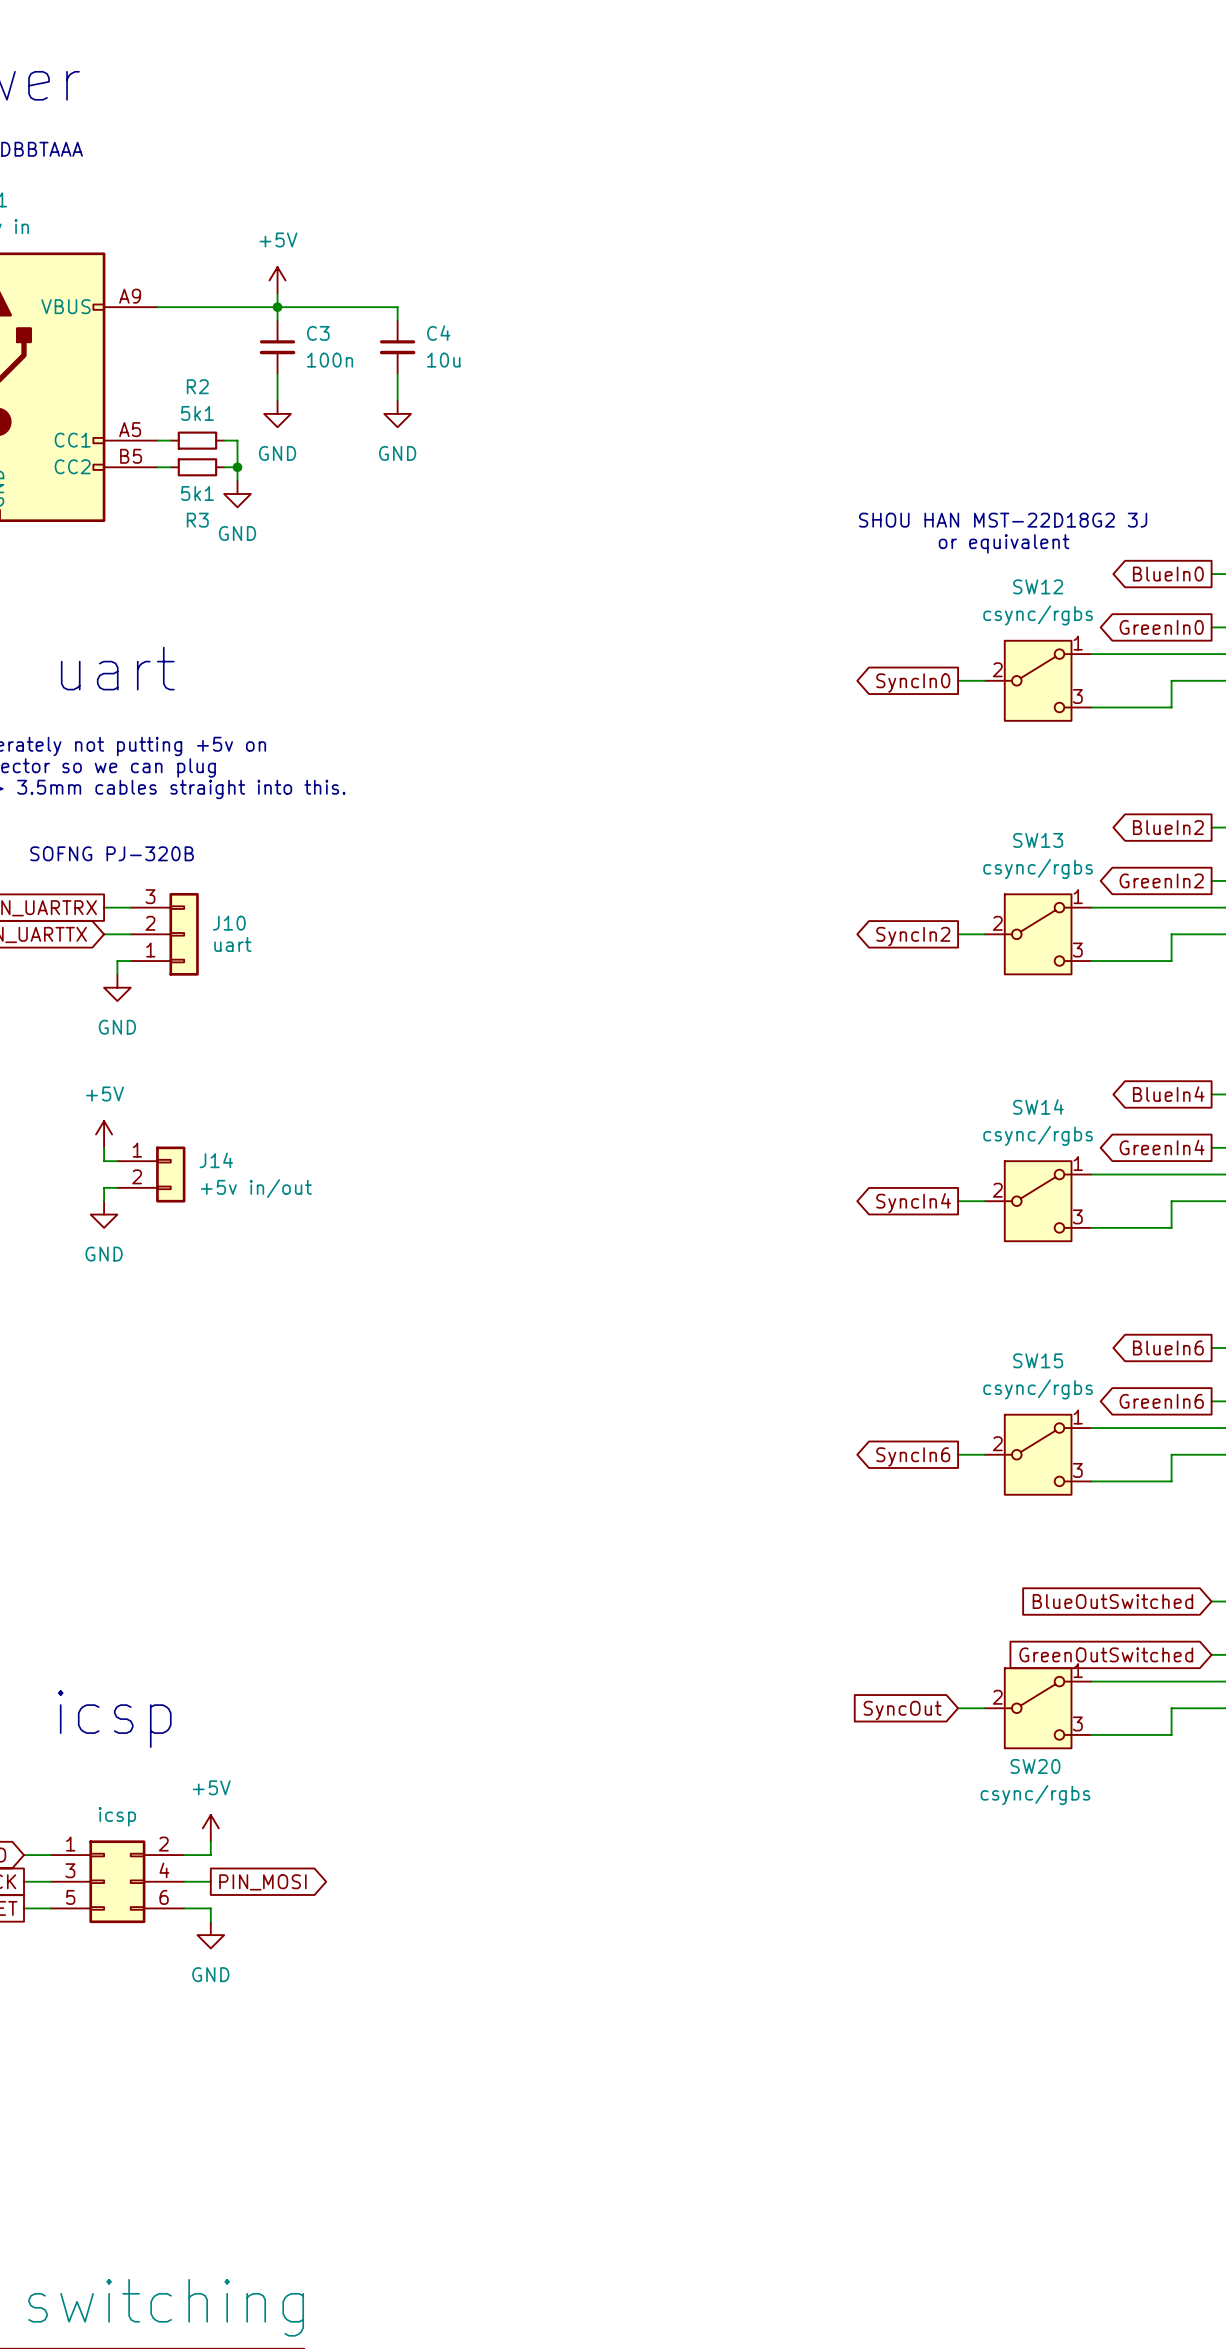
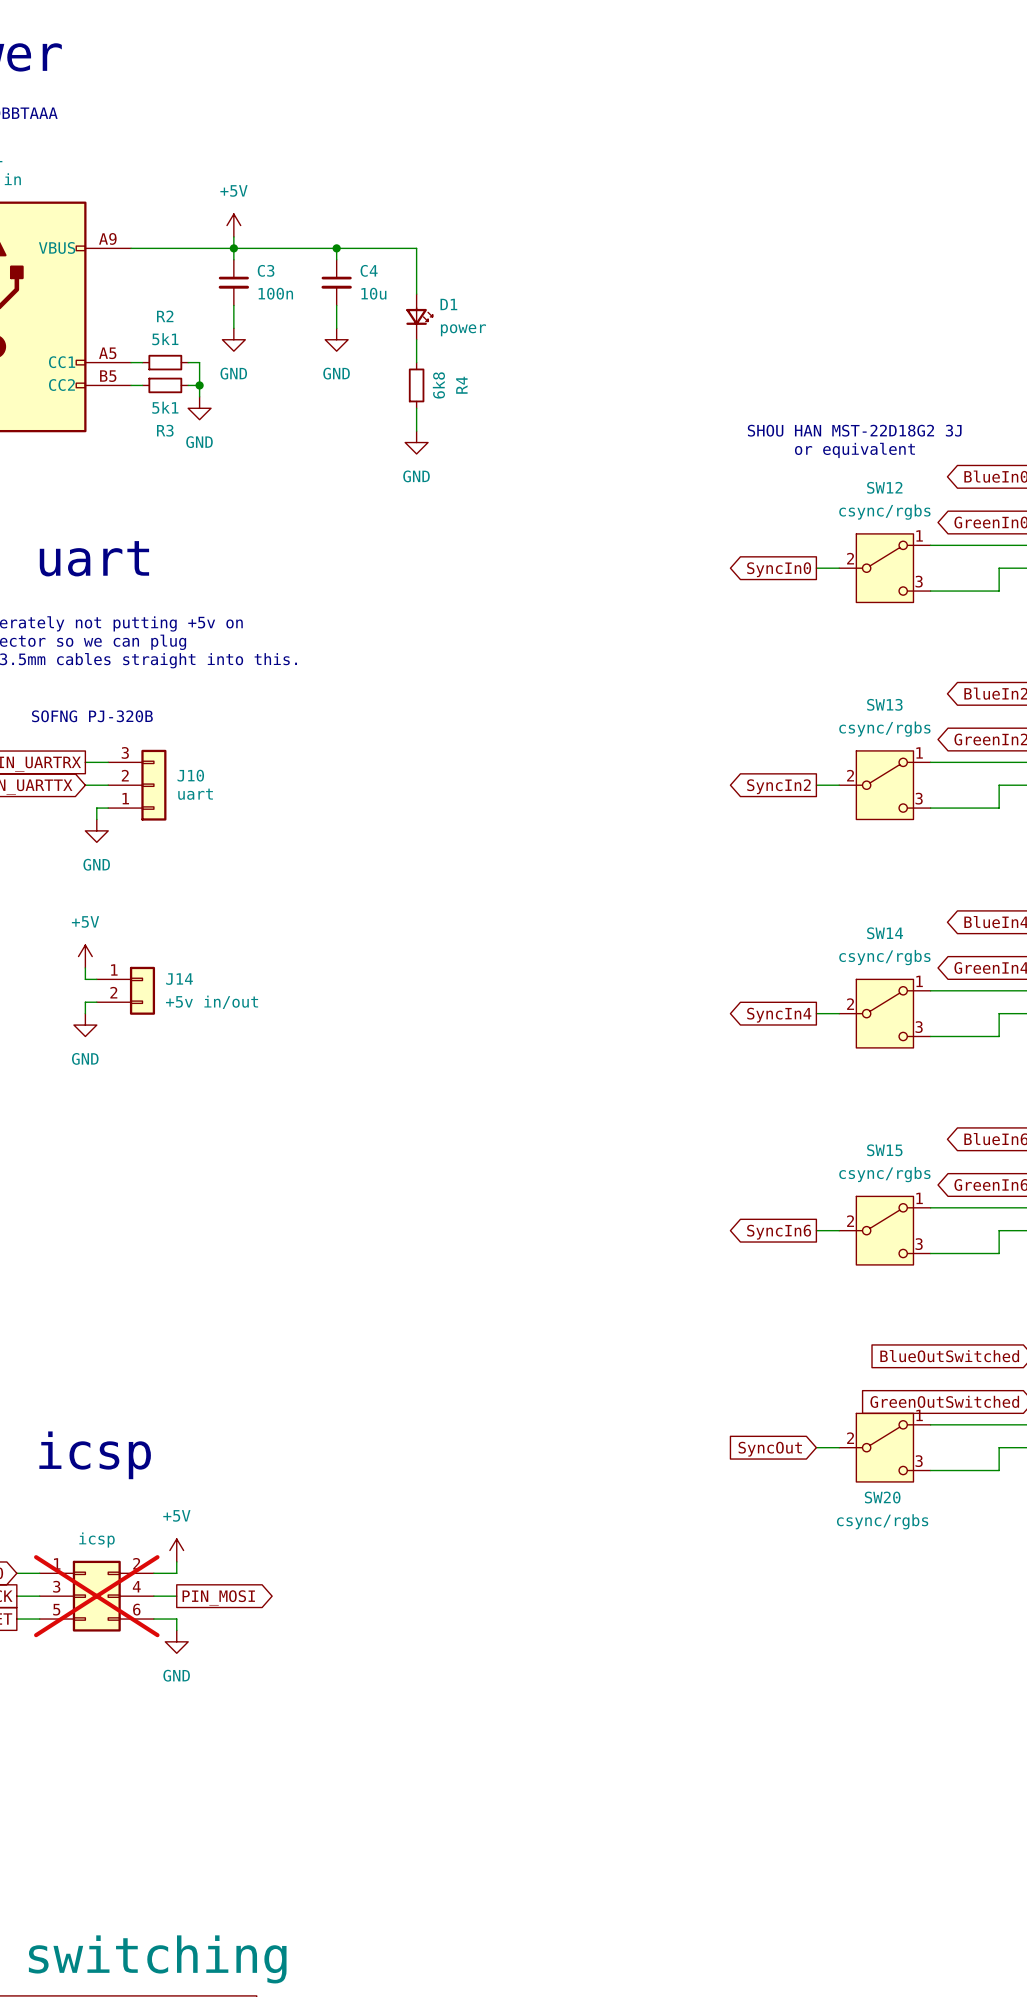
wire: none -> (336, 248) (416, 248) (416, 294)
junction: none -> (336, 248)
D1: none -> power (419, 316)
wire: none -> (416, 339) (416, 362)
R4: none -> 6k8 (416, 385)
wire: none -> (416, 408) (416, 431)
power symbol: none -> GND (416, 442)
part do-not-place cross: none -> (96, 1596)

